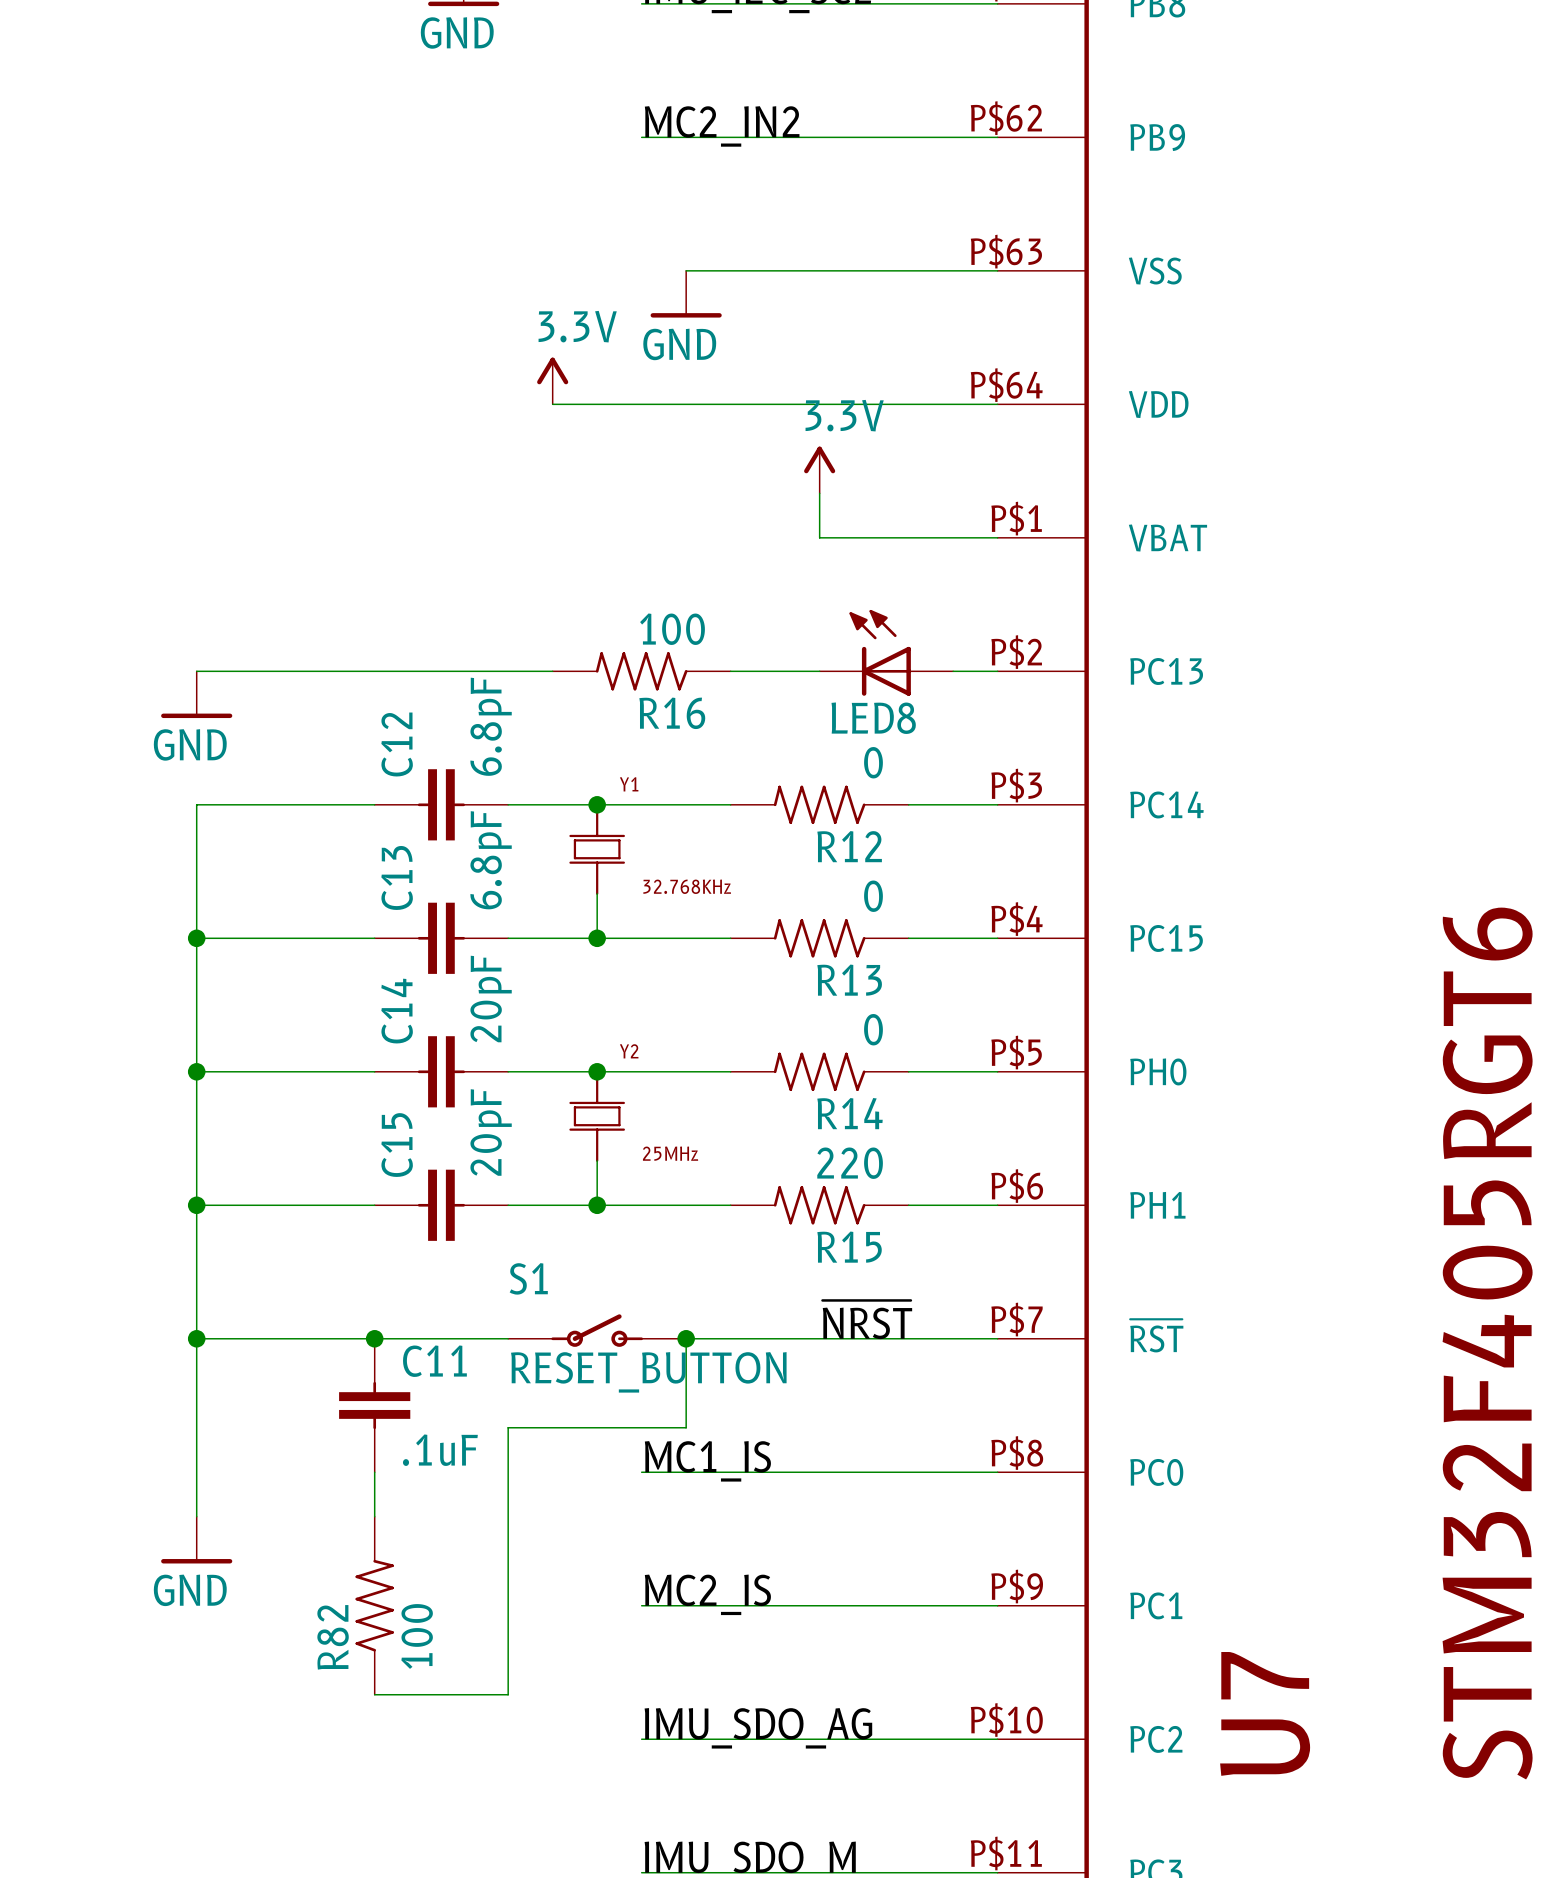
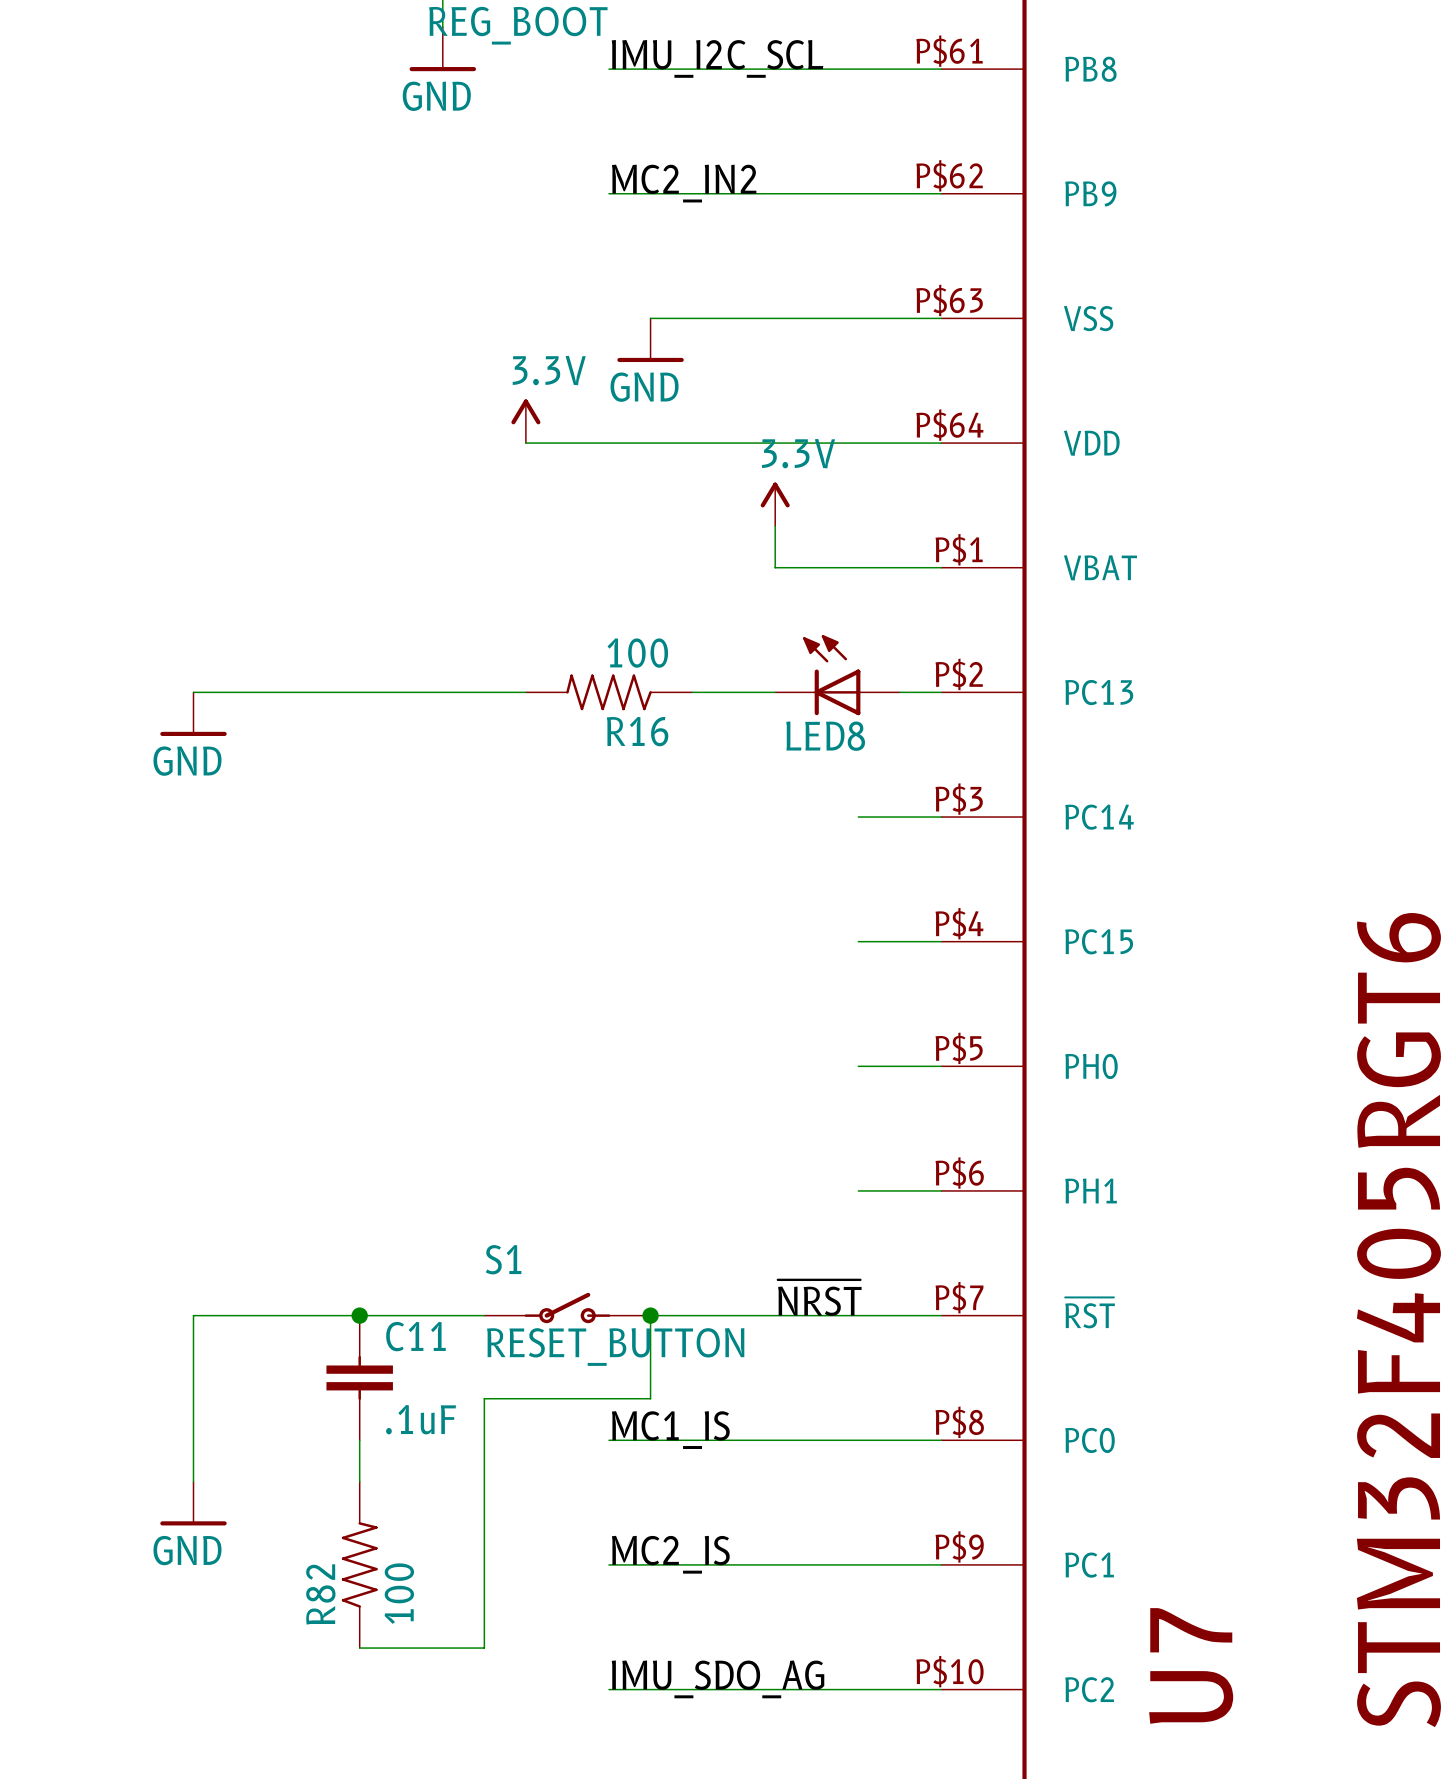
wire: (374, 804) (196, 804) (196, 1338) -> none
C12: 6.8pF (441, 804) -> none
wire: (508, 804) (730, 804) -> none
junction: (597, 804) -> none
R12: 0 (819, 804) -> none
Y1: 32.768KHz (597, 849) -> none
wire: (597, 893) (597, 938) -> none
wire: (196, 938) (374, 938) -> none
junction: (196, 938) -> none
C13: 6.8pF (441, 938) -> none
wire: (508, 938) (730, 938) -> none
junction: (597, 938) -> none
R13: 0 (819, 938) -> none
wire: (196, 1071) (374, 1071) -> none
junction: (196, 1071) -> none
C14: 20pF (441, 1071) -> none
wire: (508, 1071) (730, 1071) -> none
junction: (597, 1071) -> none
R14: 0 (819, 1071) -> none
Y2: 25MHz (597, 1116) -> none
wire: (597, 1160) (597, 1205) -> none
wire: (196, 1205) (374, 1205) -> none
junction: (196, 1205) -> none
C15: 20pF (441, 1205) -> none
wire: (508, 1205) (730, 1205) -> none
junction: (597, 1205) -> none
R15: 220 (819, 1205) -> none
junction: (196, 1338) -> none

